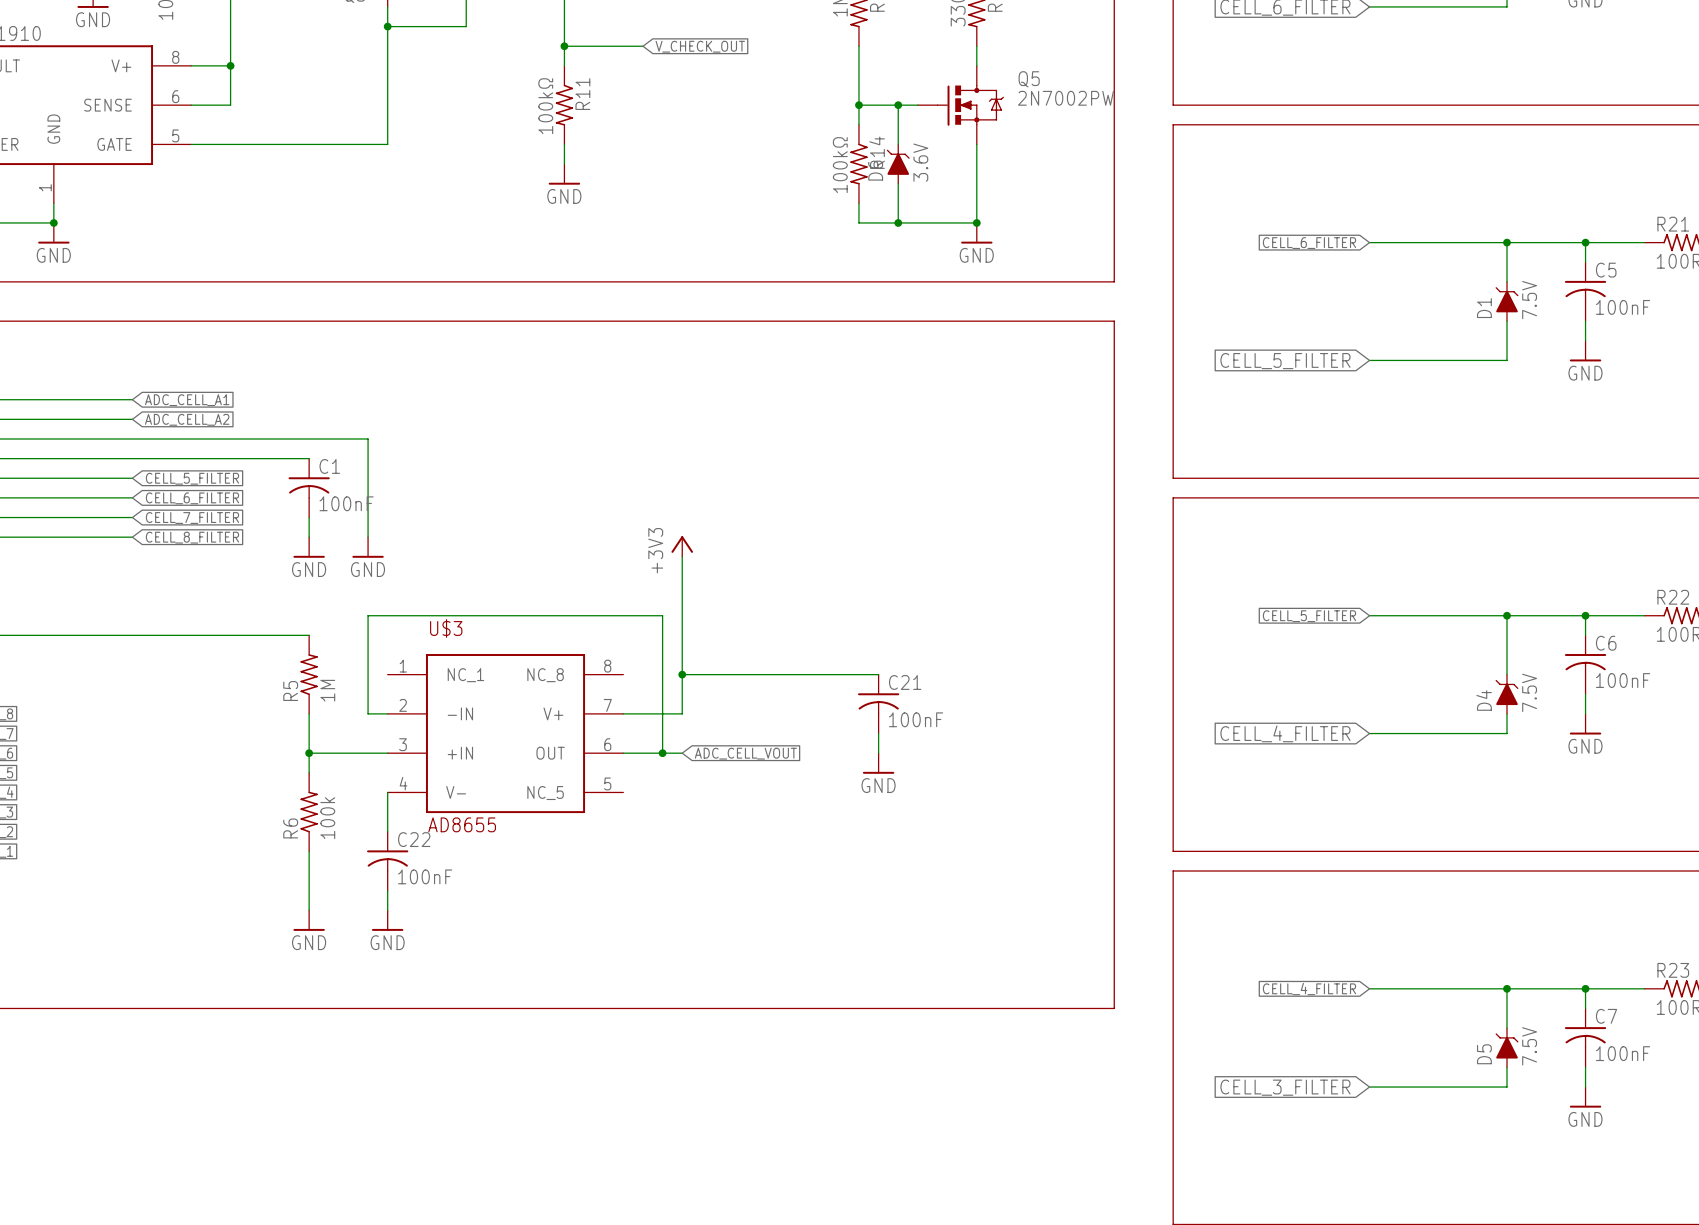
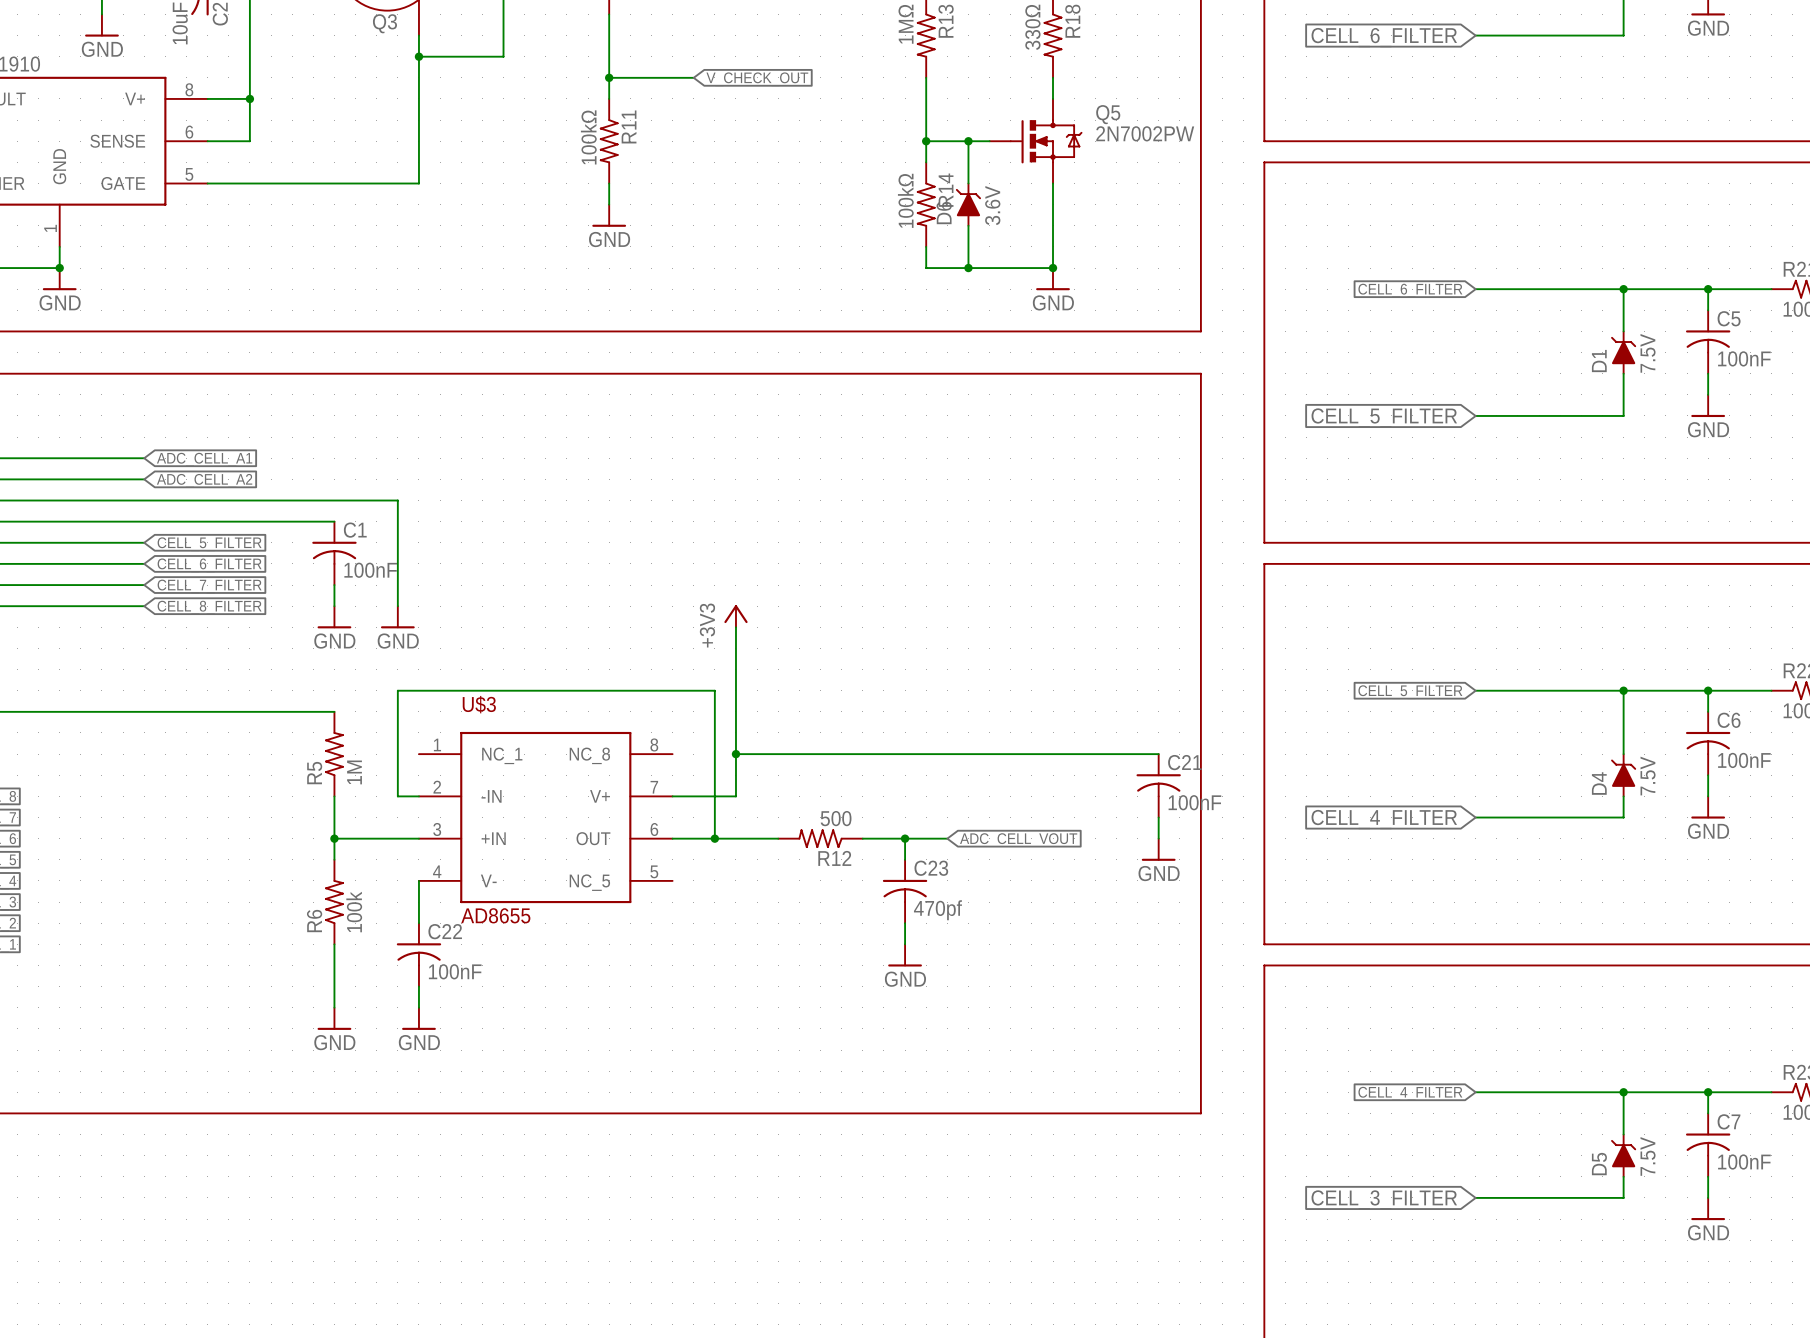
wire: none -> (947, 754) (1158, 754)
C21 position: (878, 704) -> (1158, 785)
wire: (878, 733) (878, 753) -> (862, 838) (947, 838)
wire: none -> (1158, 817) (1158, 838)
wire: none -> (735, 838) (778, 838)
global label: ADC_CELL_VOUT (745, 753) -> none
R12: none -> 500 (820, 838)
wire: none -> (905, 838) (905, 859)
junction: none -> (905, 838)
global label: none -> ADC_CELL_VOUT (1018, 840)
power symbol: GND (878, 763) -> none
power symbol: none -> GND (1158, 849)
C23: none -> 470pf (905, 891)
wire: none -> (905, 923) (905, 944)
power symbol: none -> GND (905, 955)

